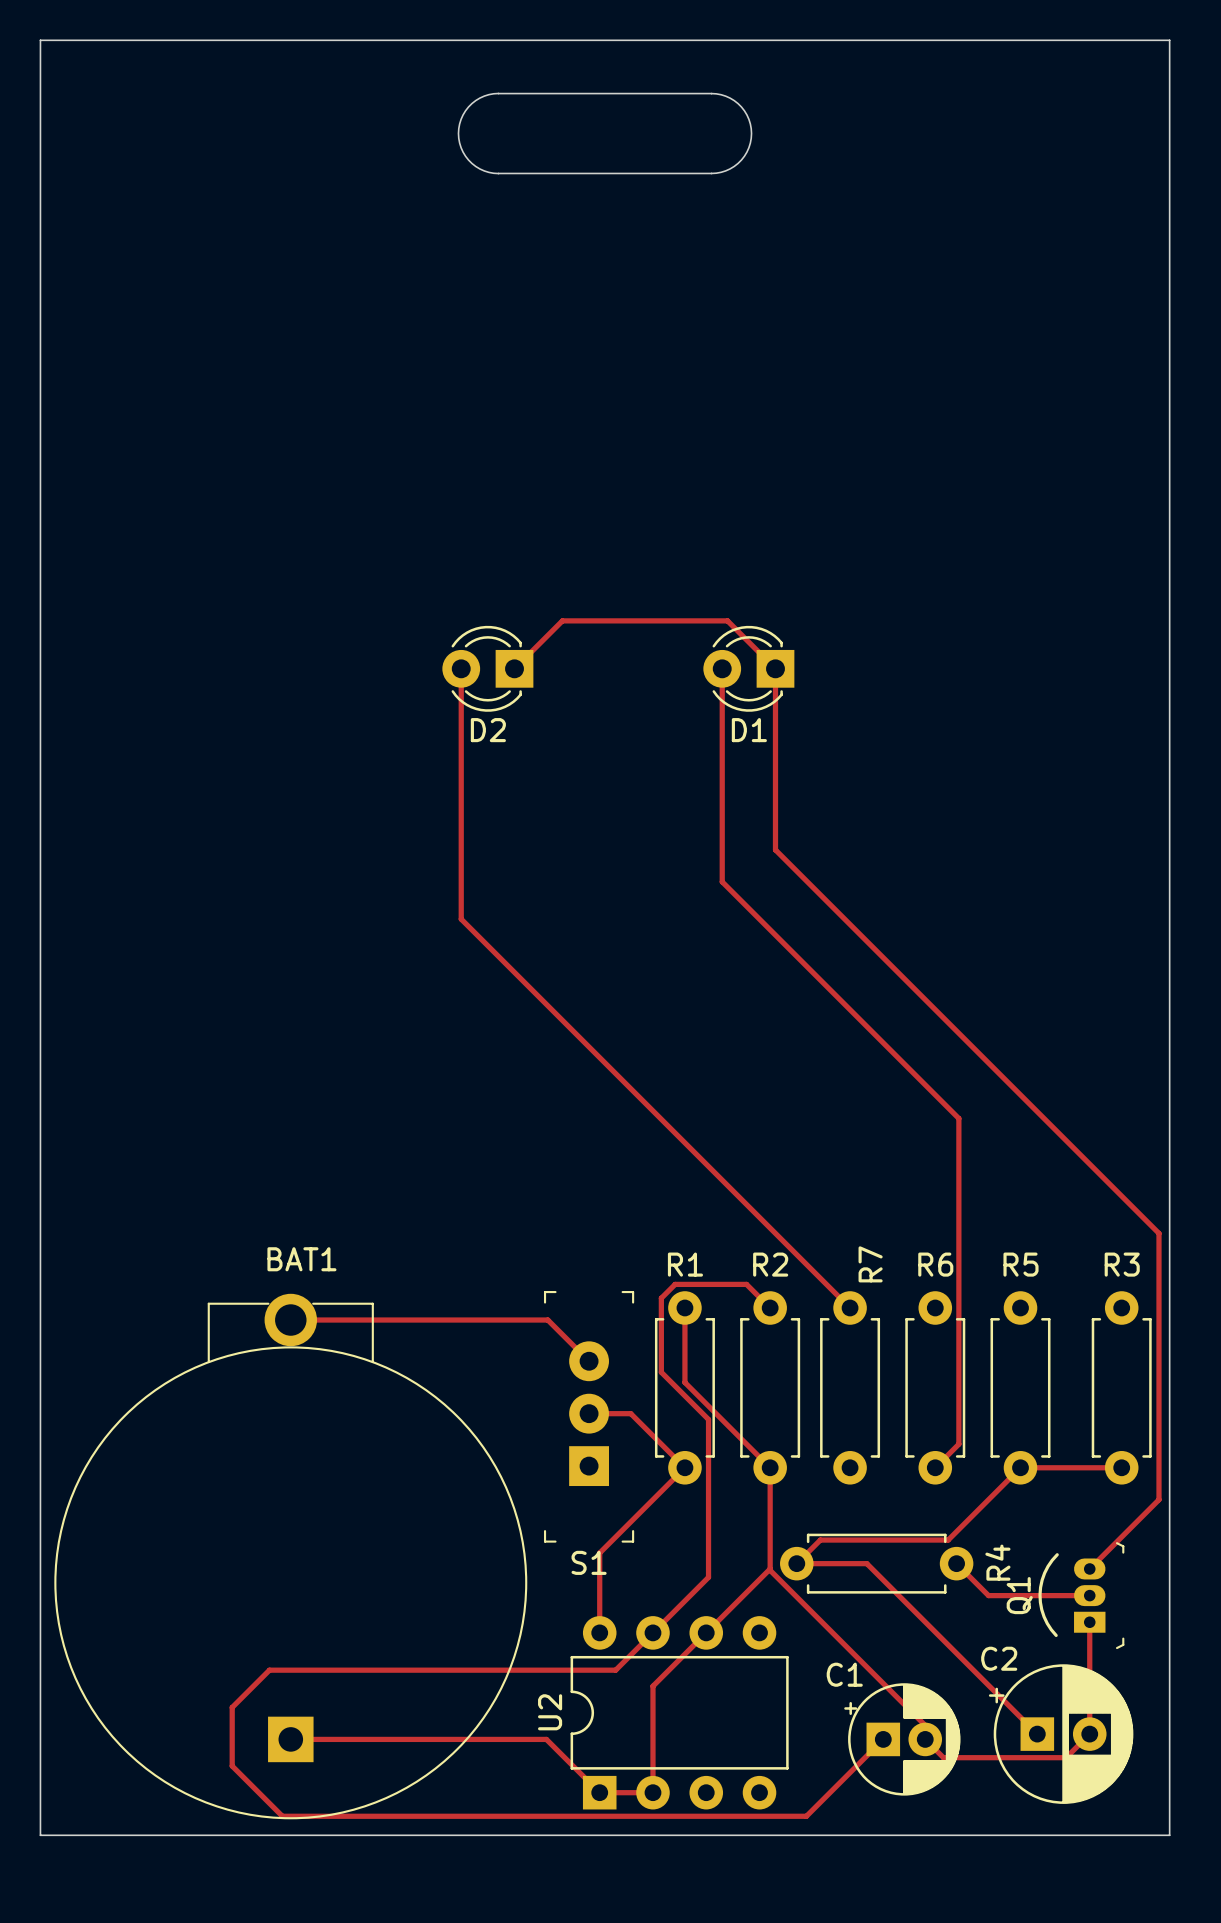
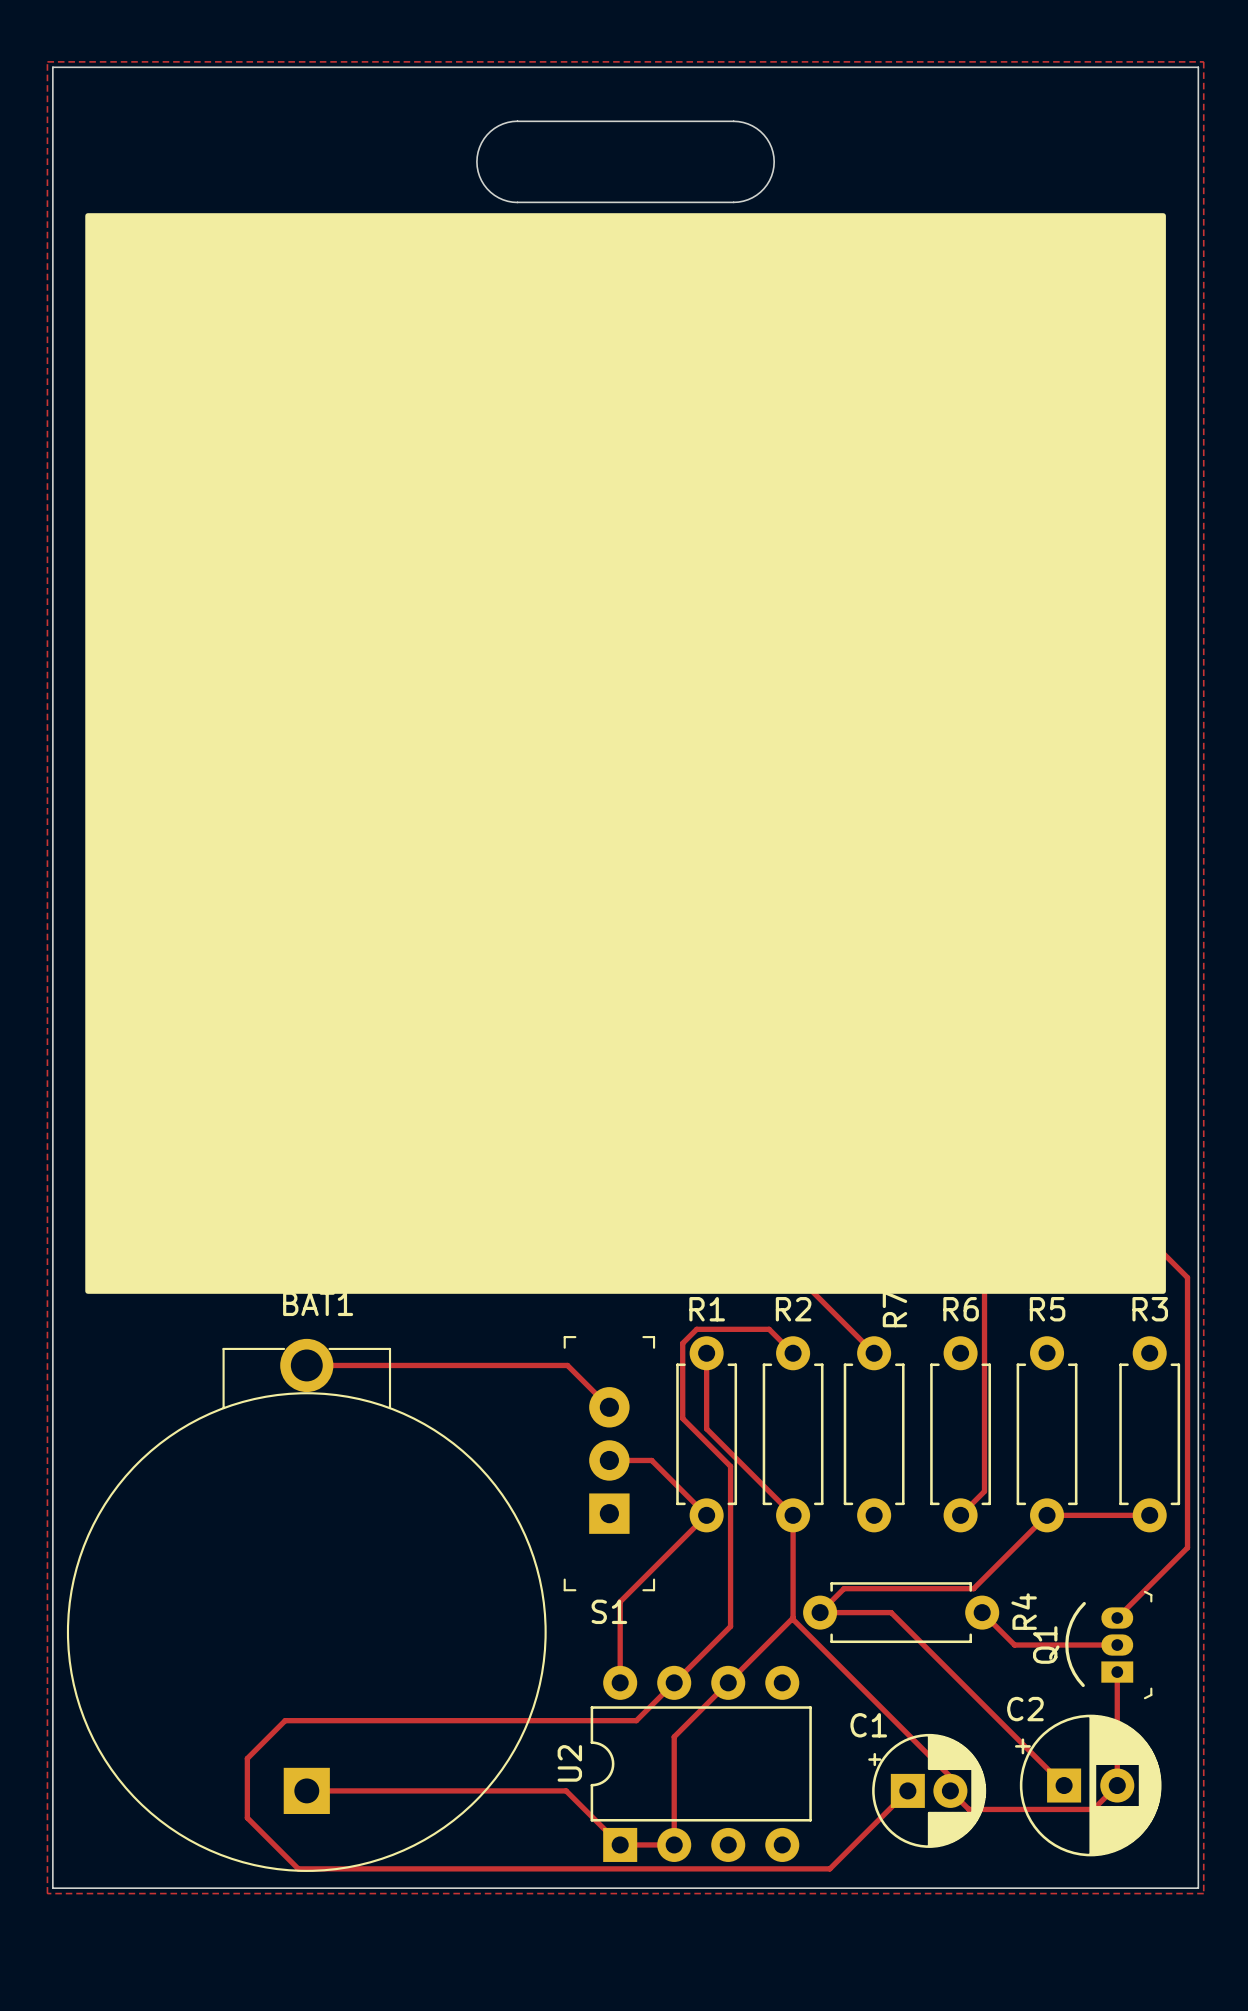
zone outline: none -> (47, 61) (47, 1893) (1203, 1893) (1203, 61) (47, 61)
drawing: none -> [85, 213, 1166, 1294]

